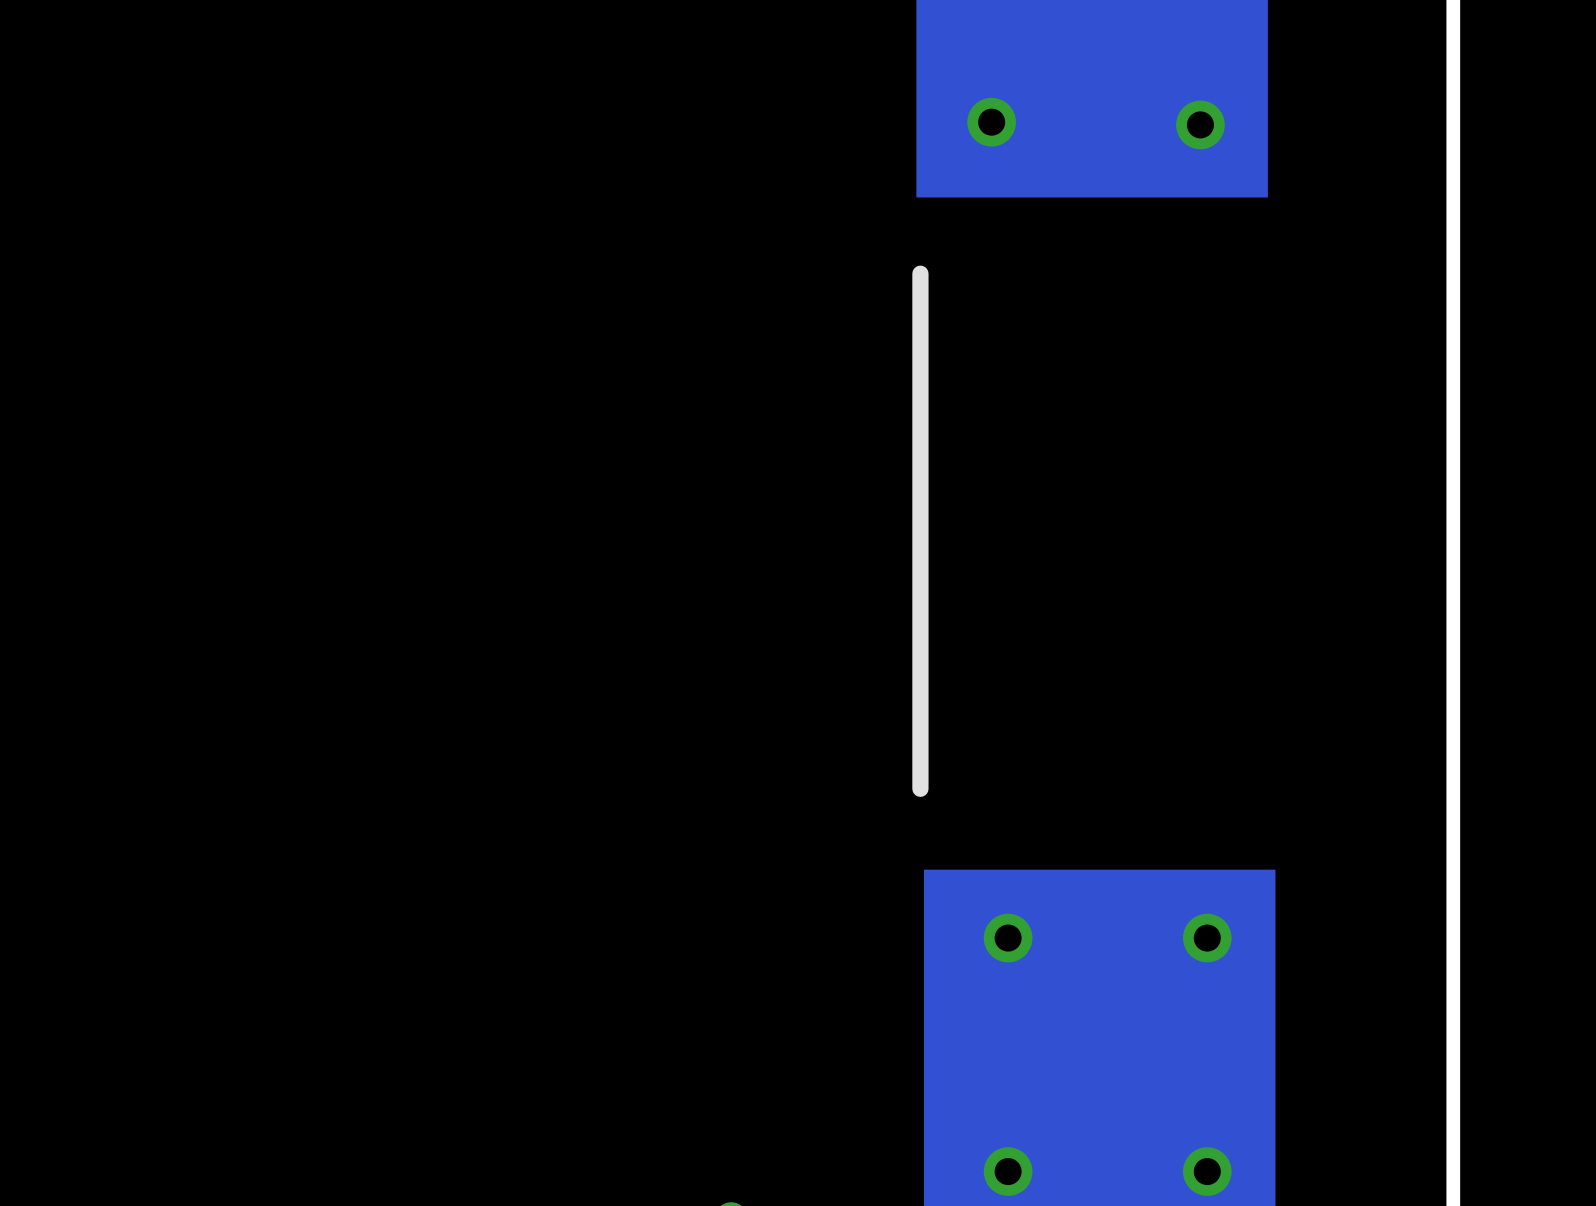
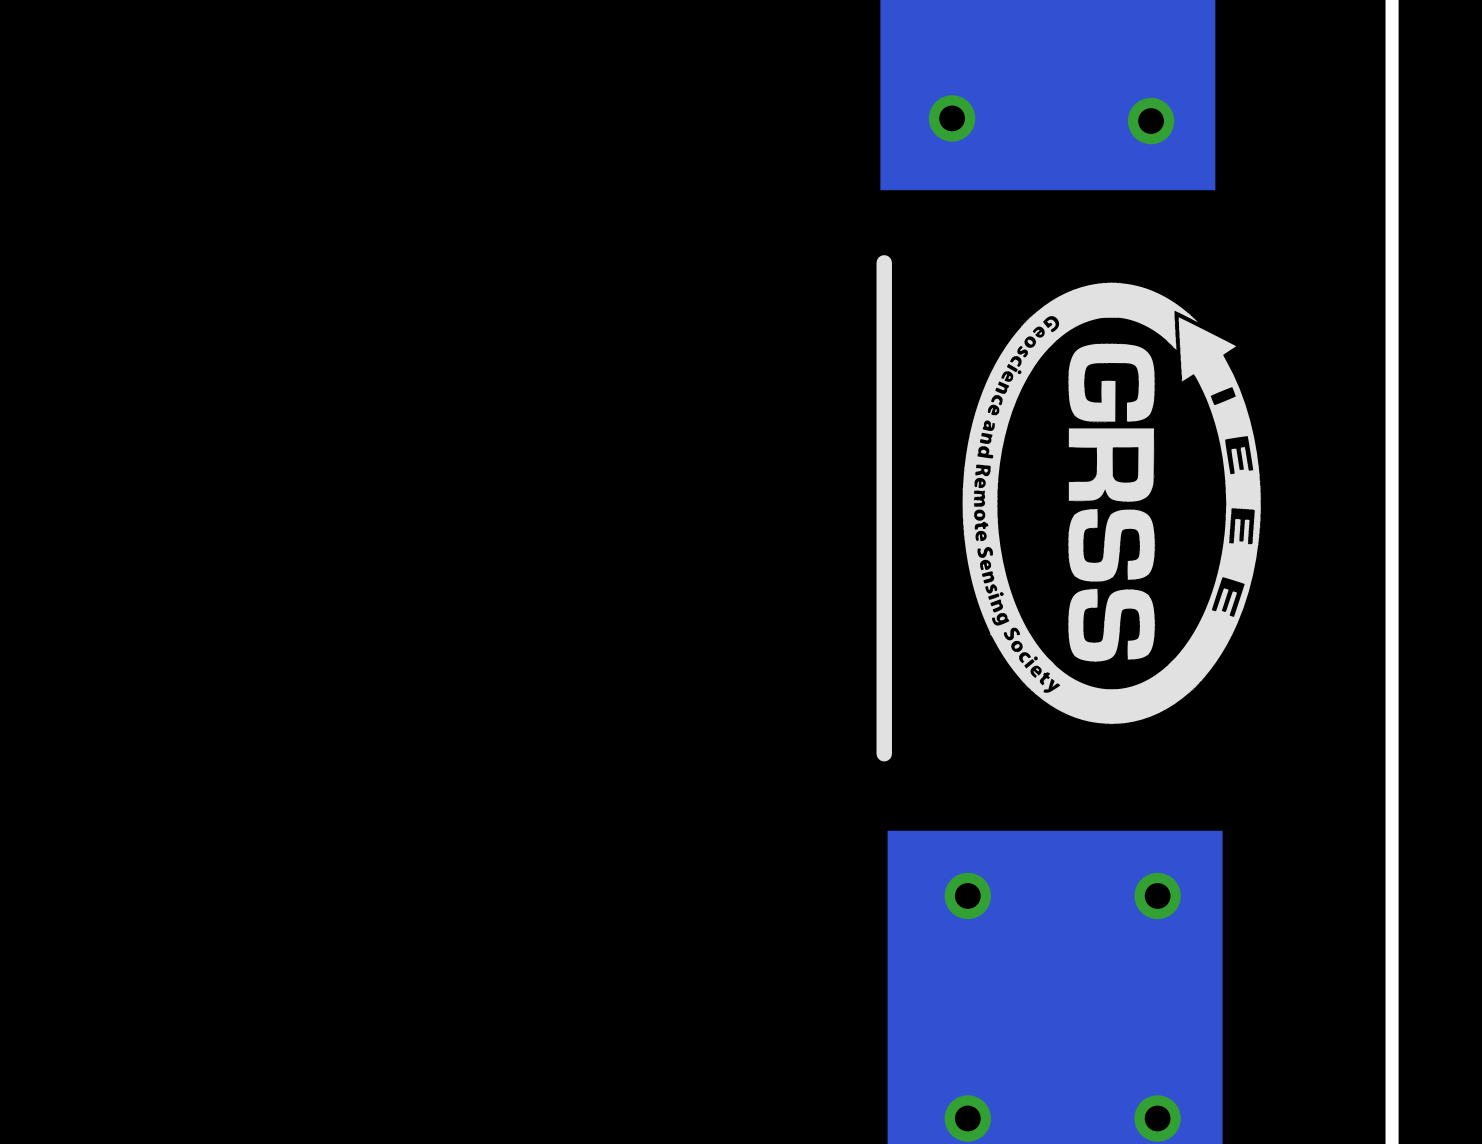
drawing: none -> [962, 282, 1262, 725]

